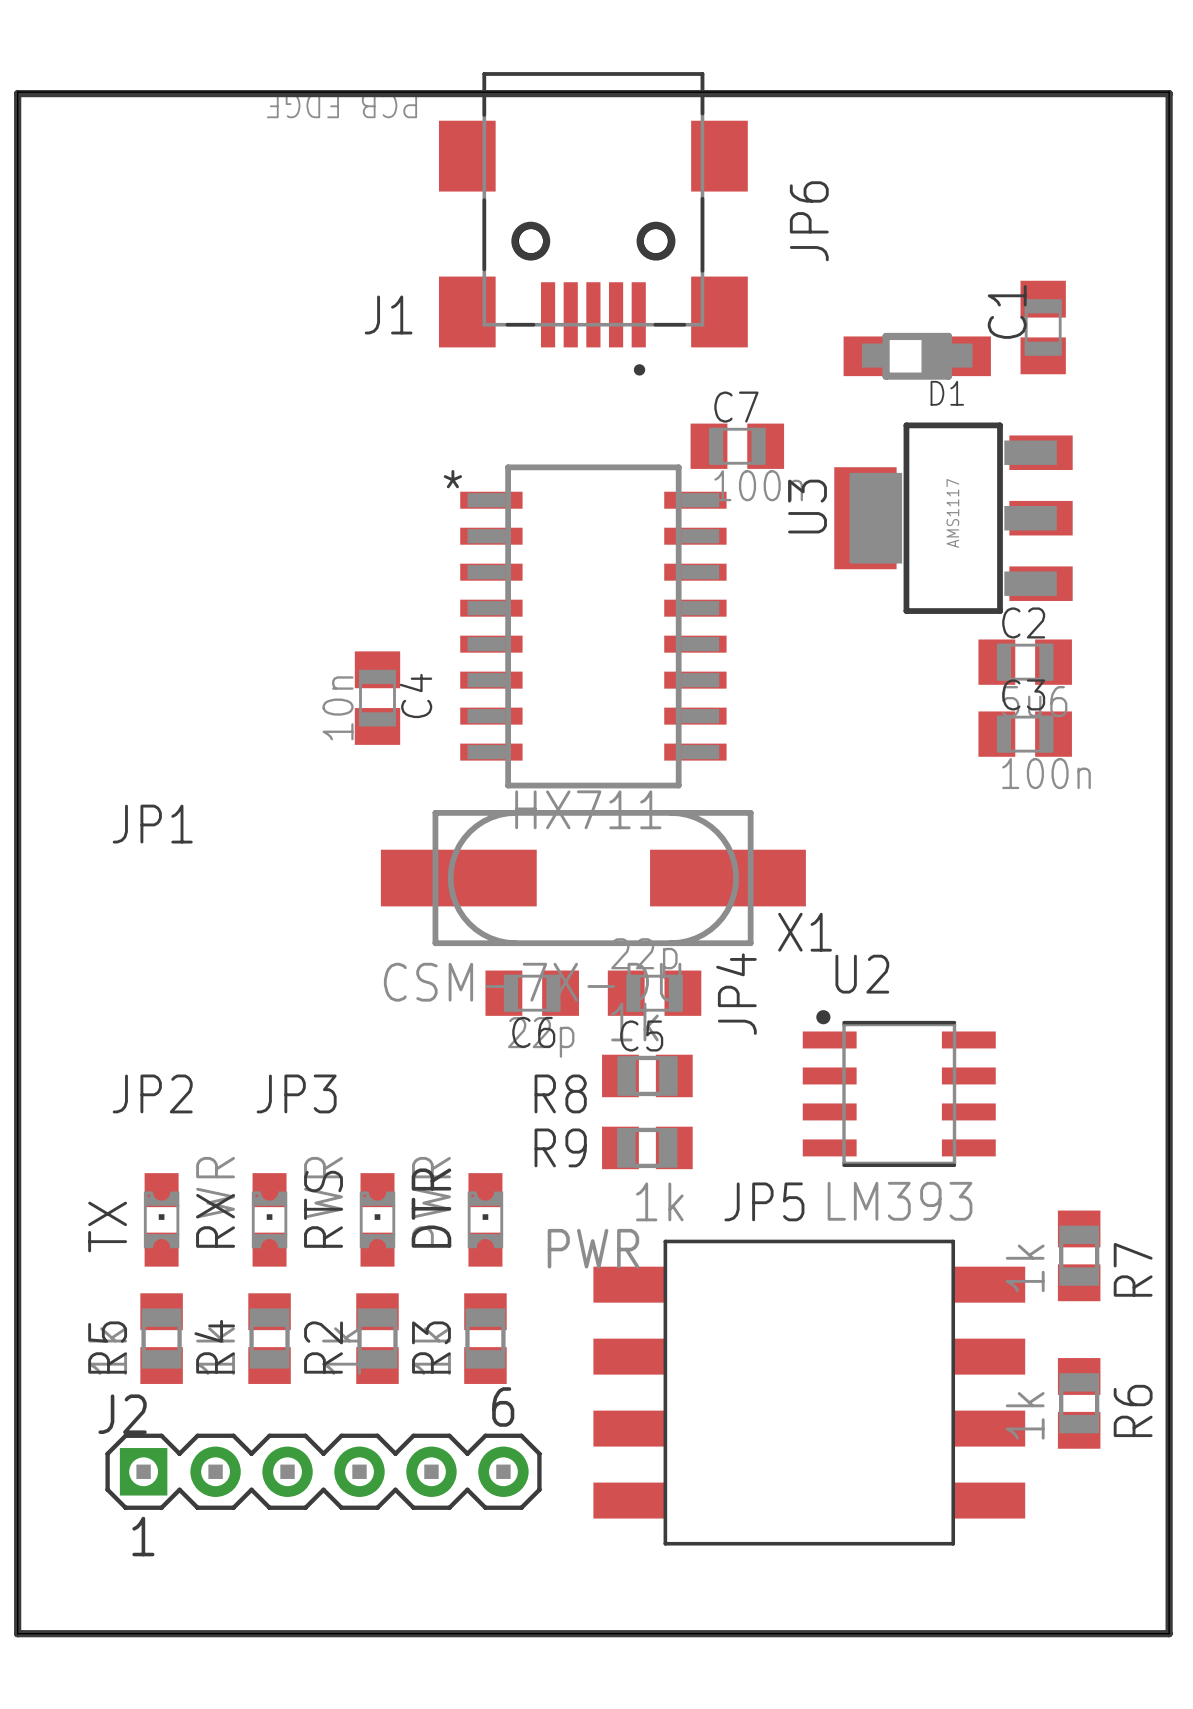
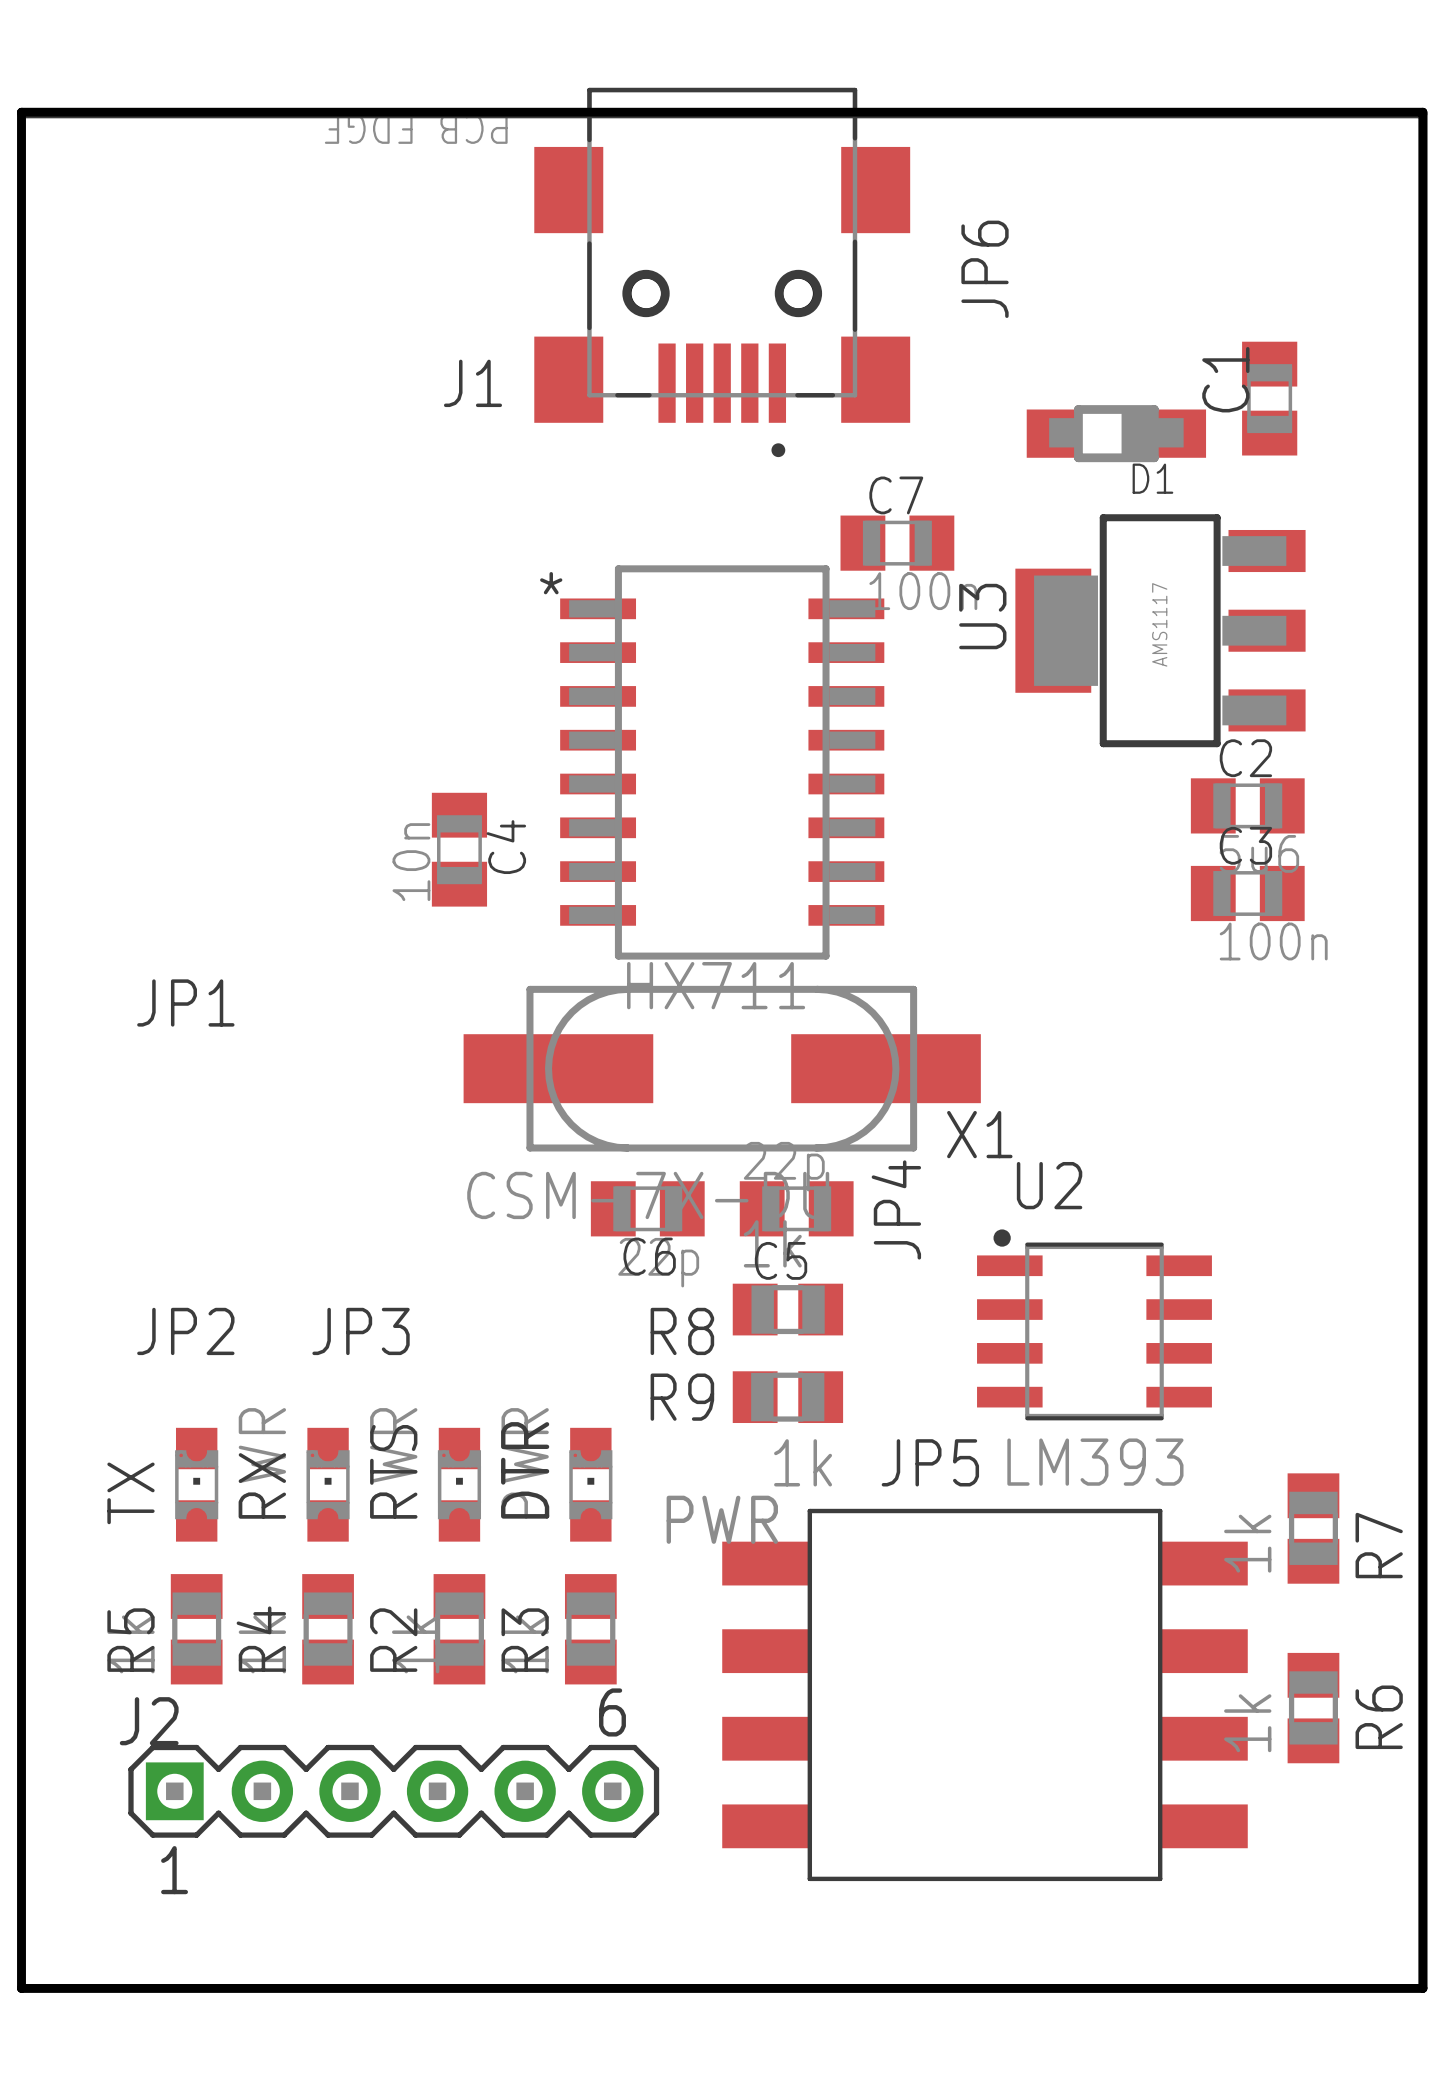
board edge width: thin (17, 92) (1169, 92) (1169, 1633) (17, 1633) (17, 92) -> thick (21, 112) (1422, 112) (1422, 1988) (21, 1988) (21, 112)

